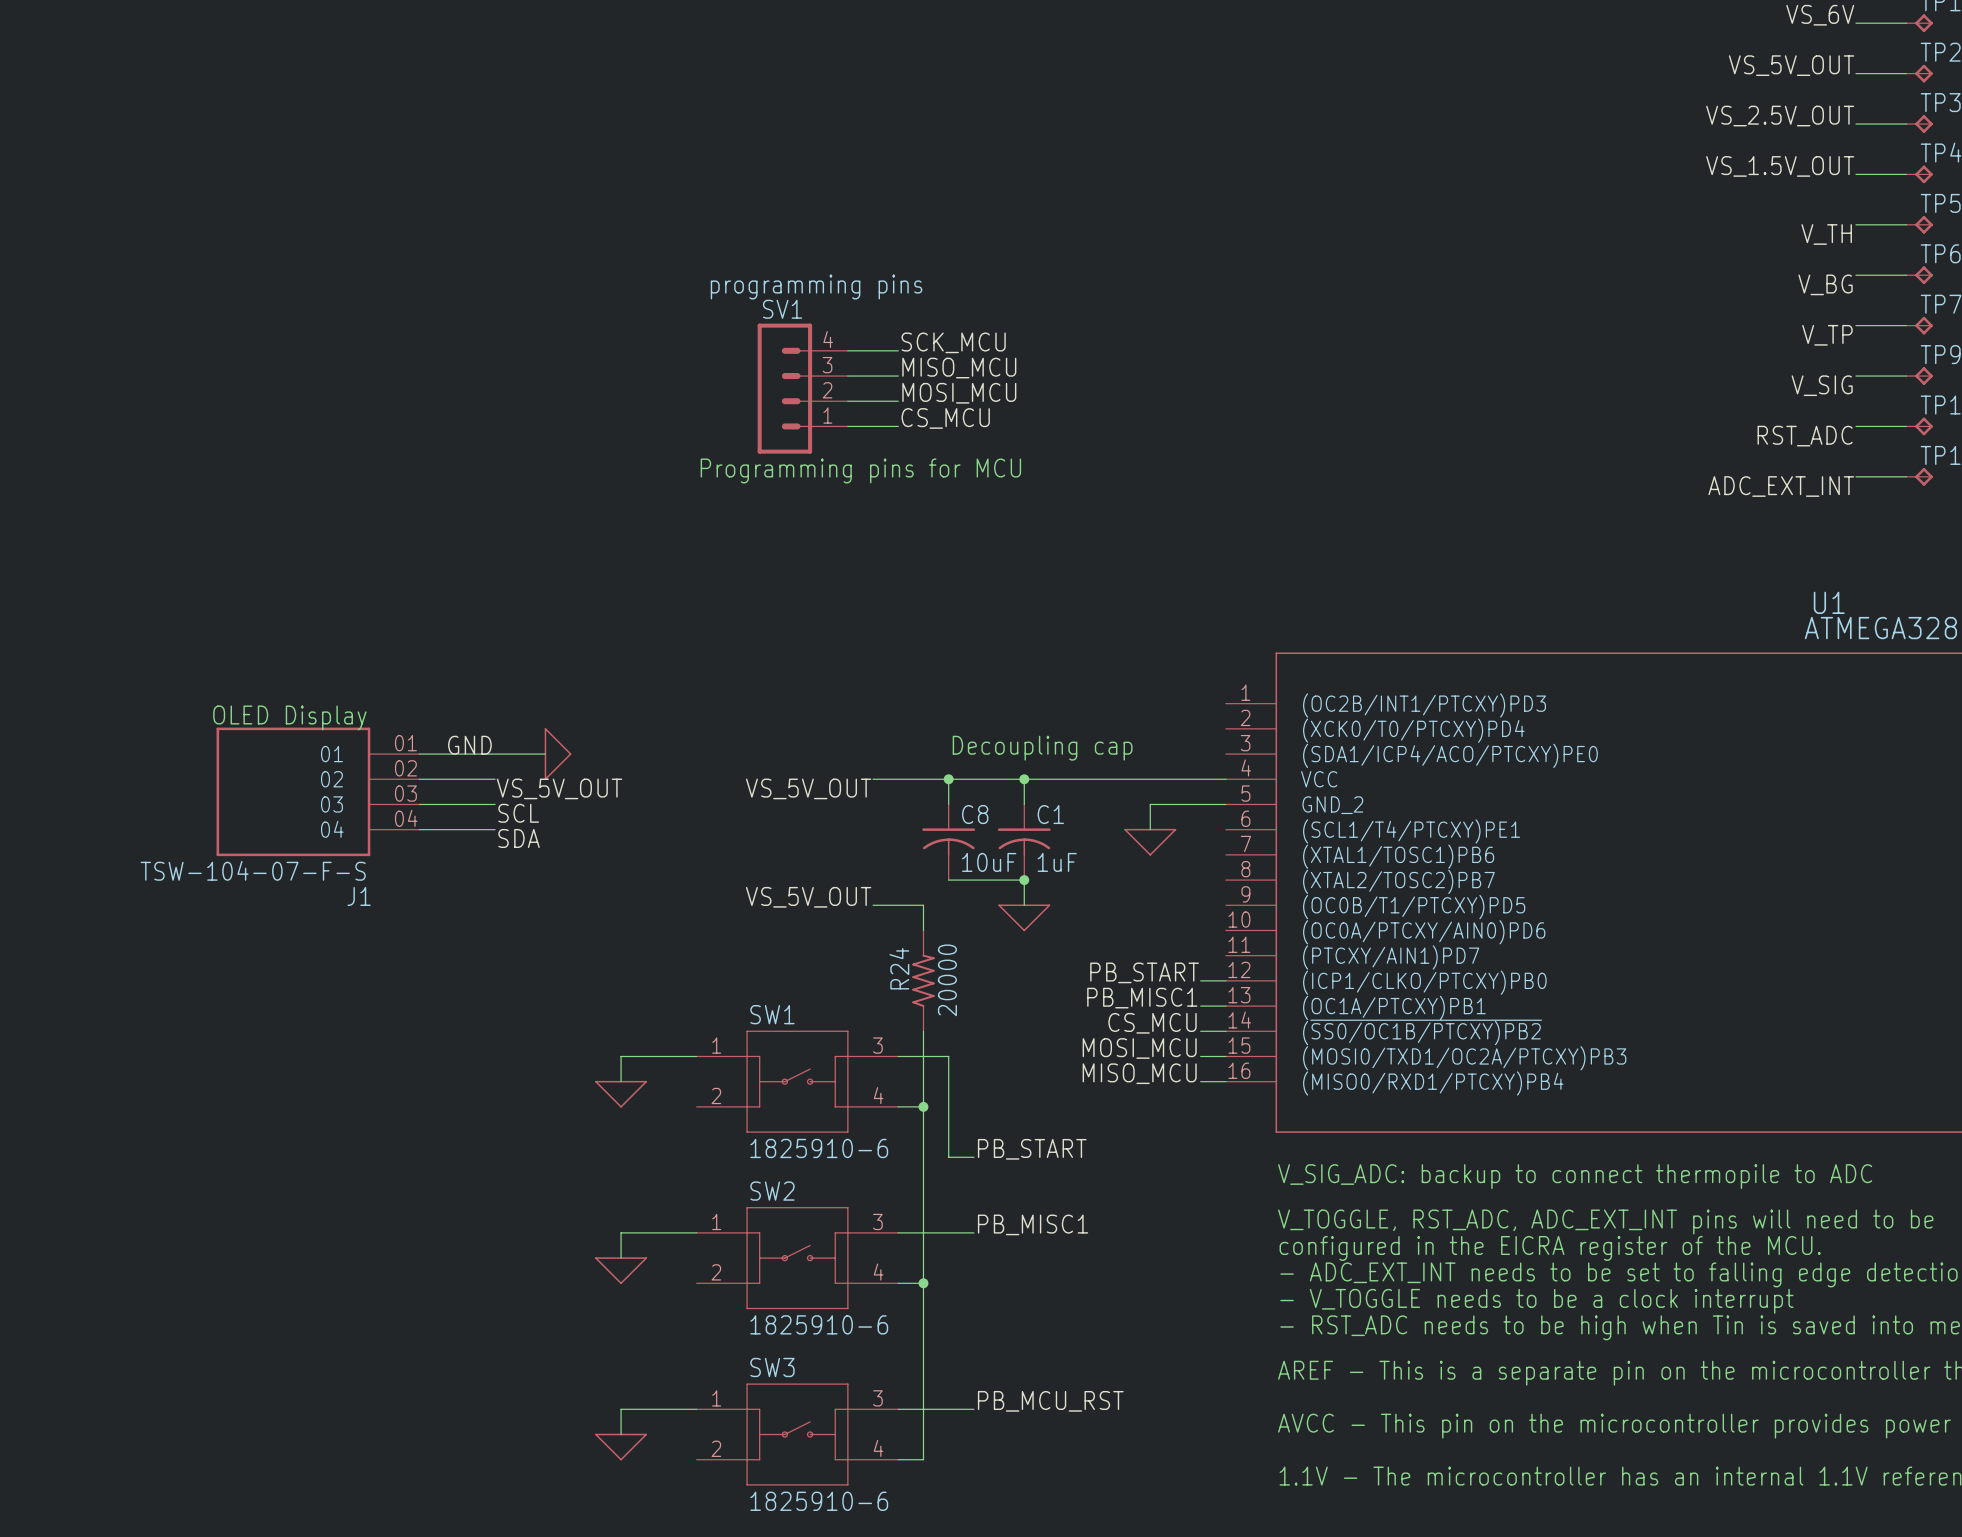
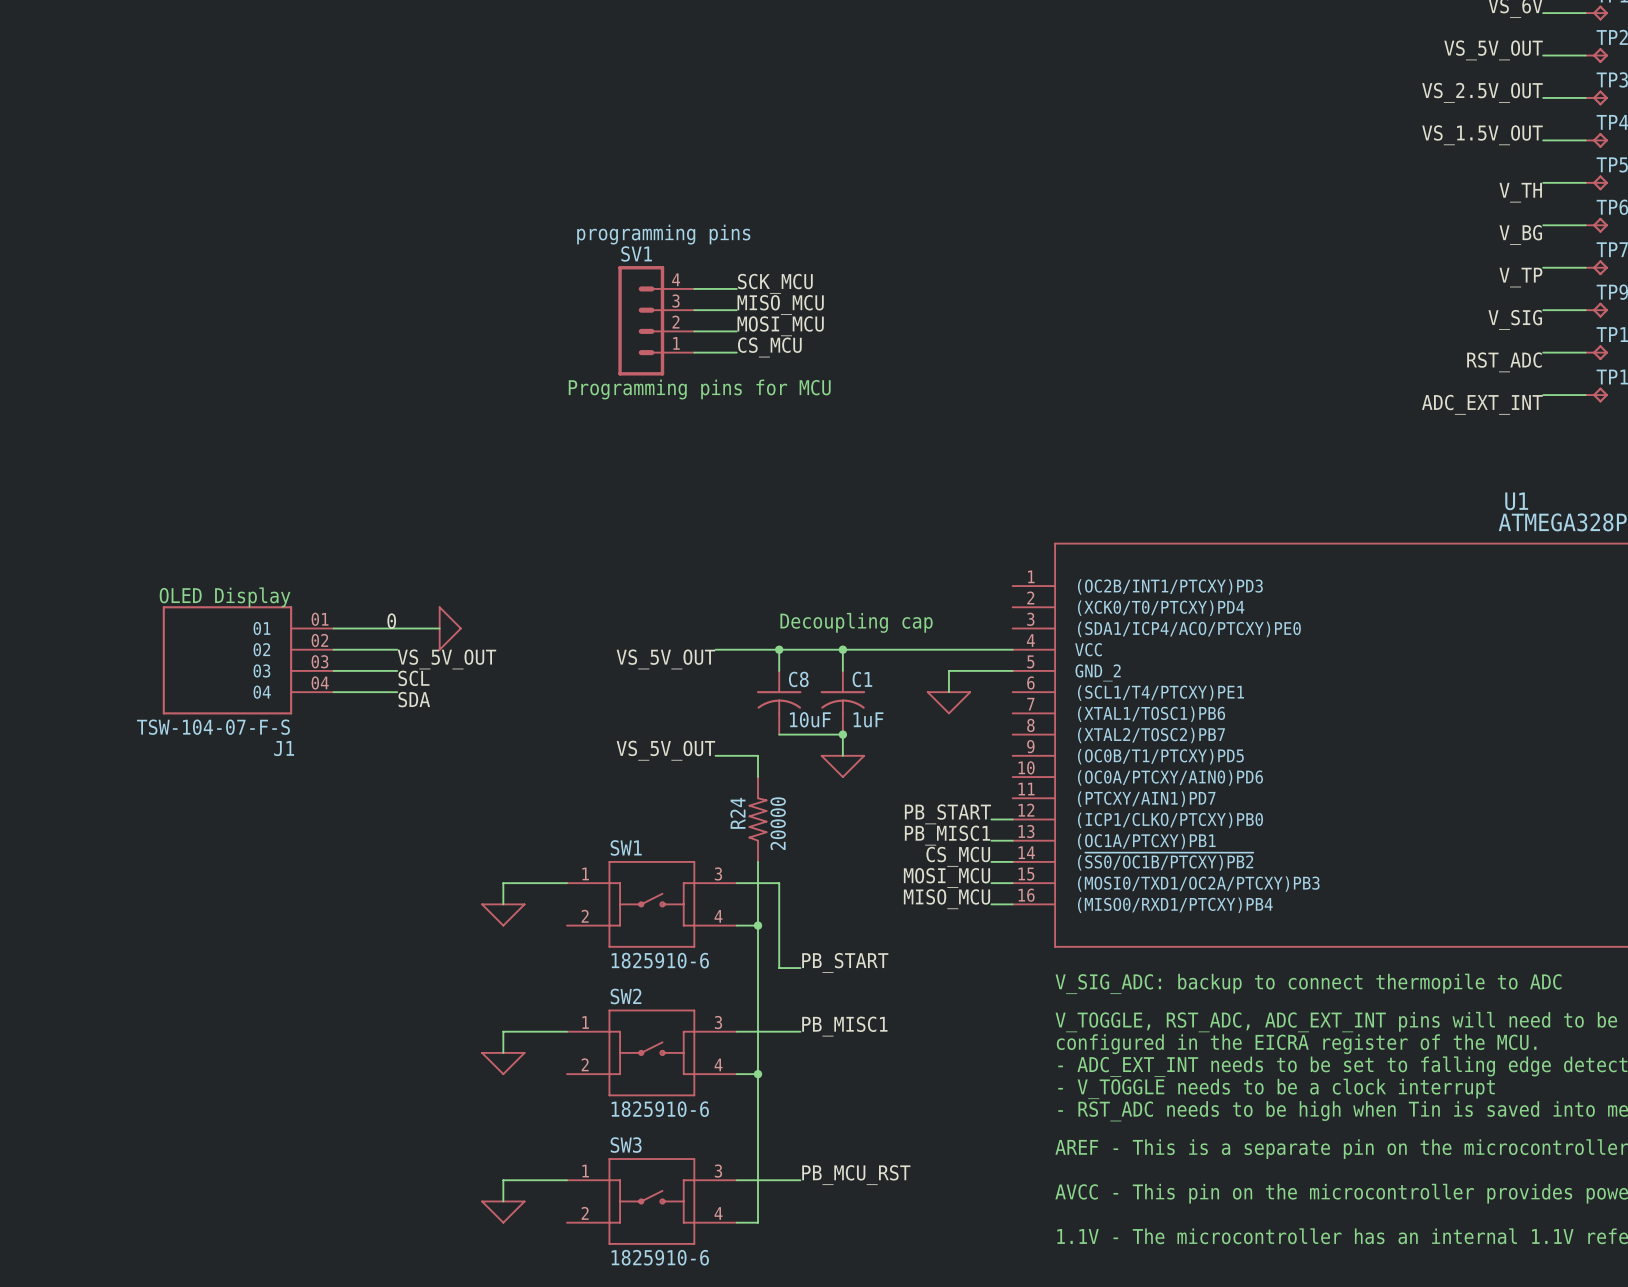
label: GND (469, 745) -> 0 (391, 621)

